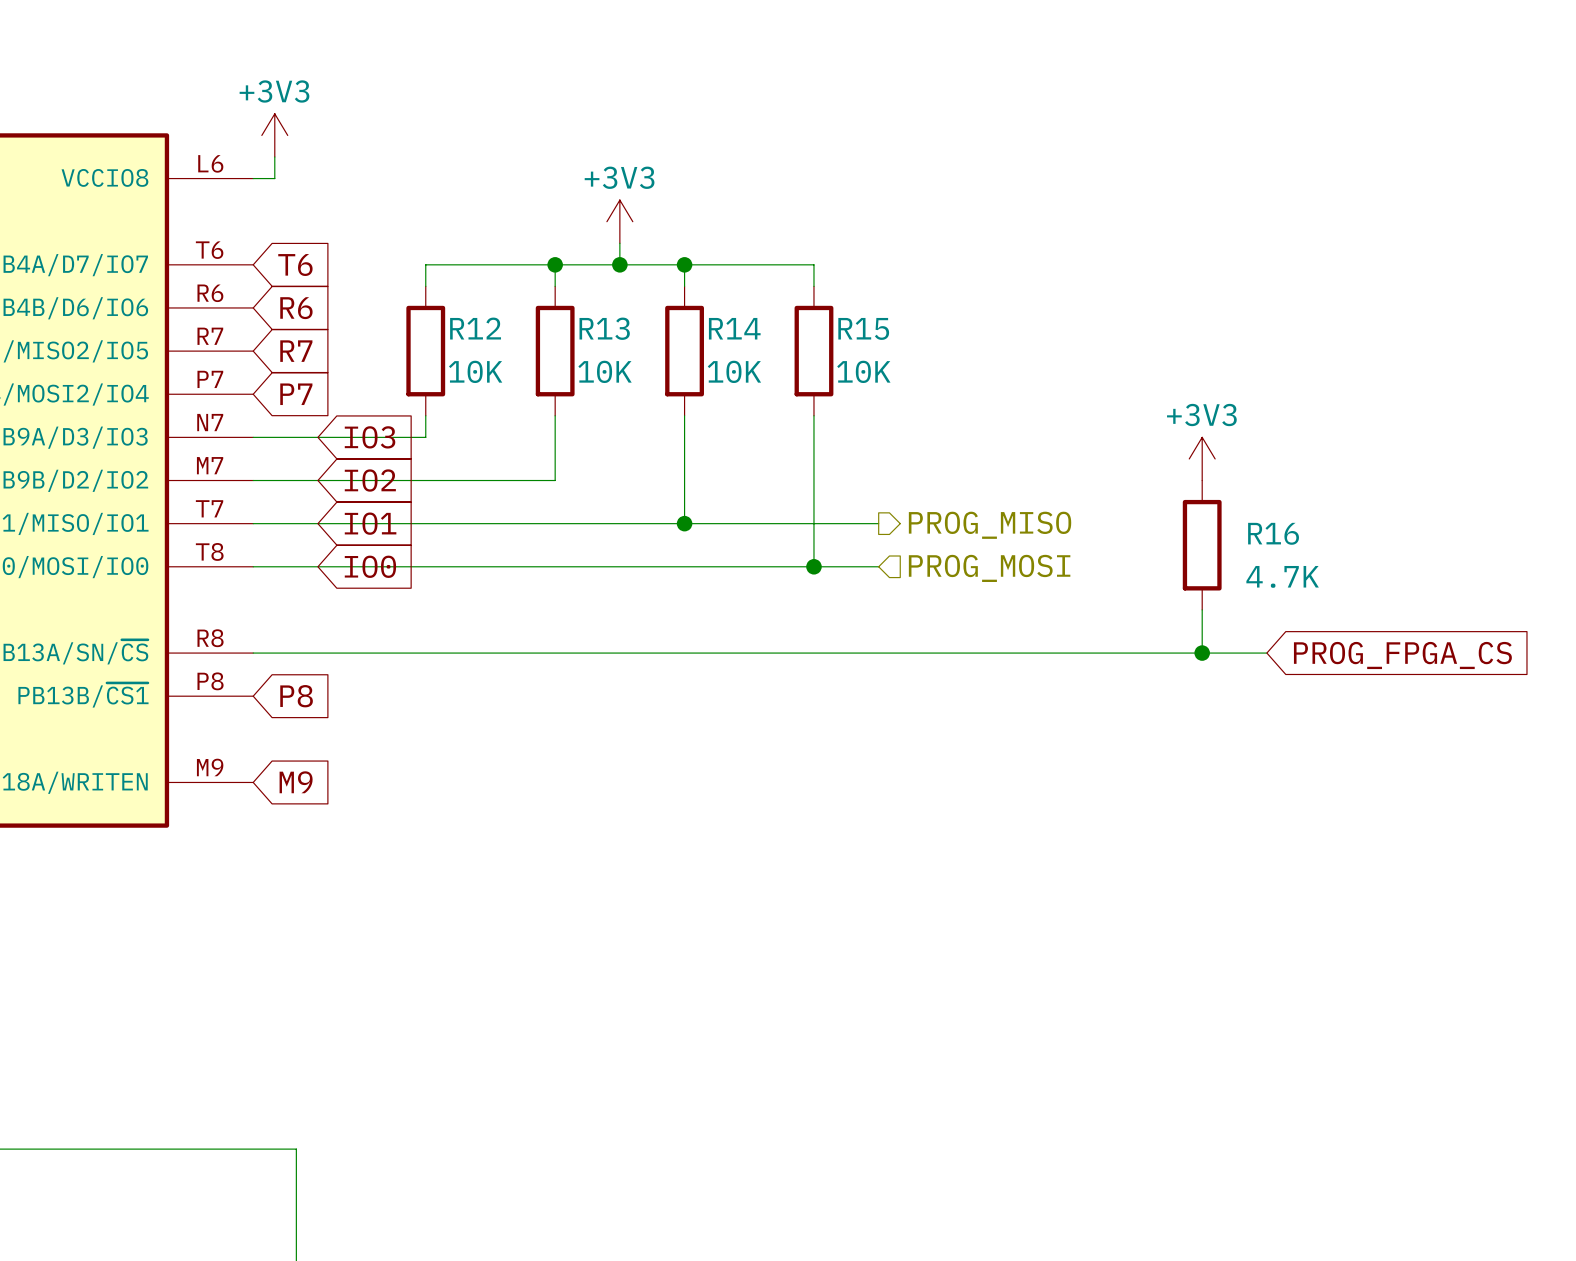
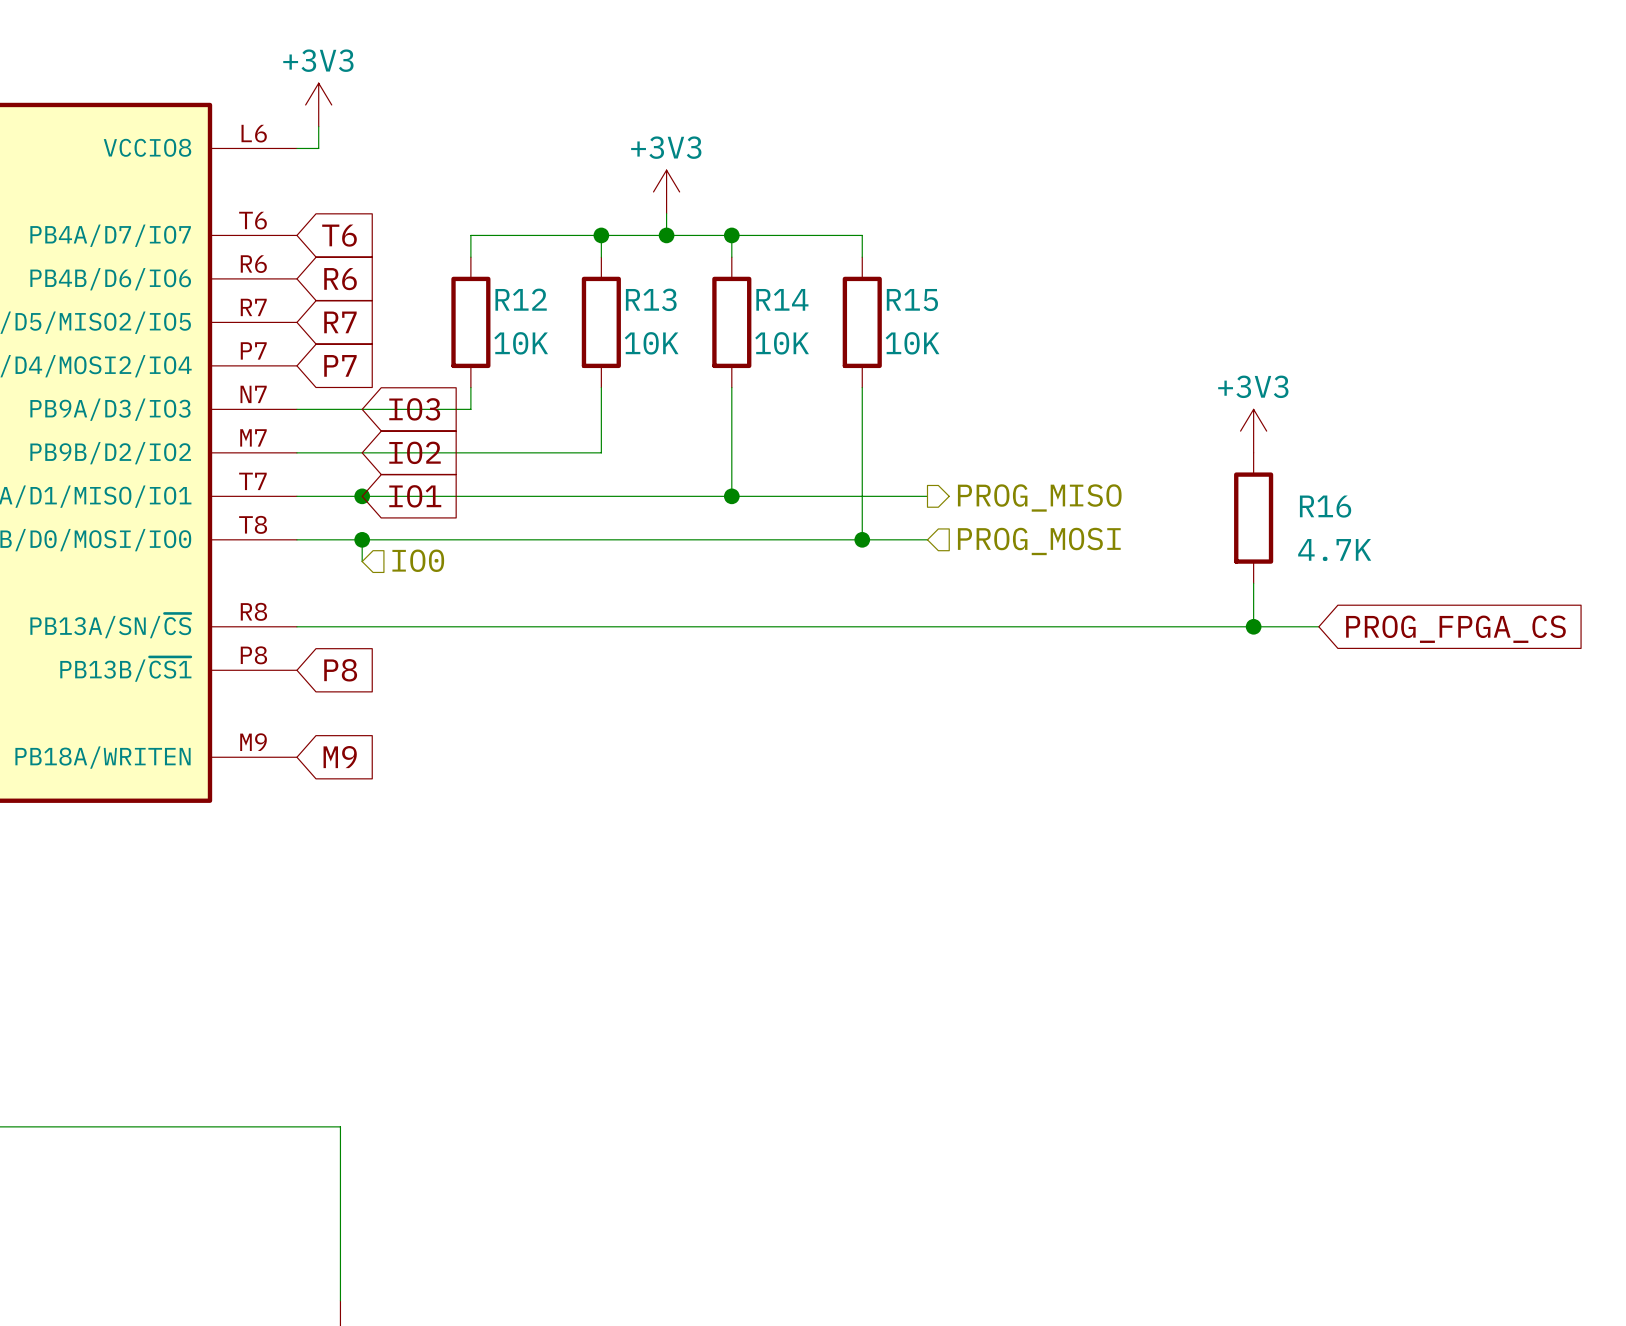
junction: none -> (362, 496)
wire: none -> (362, 539) (362, 561)
junction: none -> (362, 539)
global label: IO0 (370, 566) -> none
hierarchical label: none -> IO0 (418, 560)

